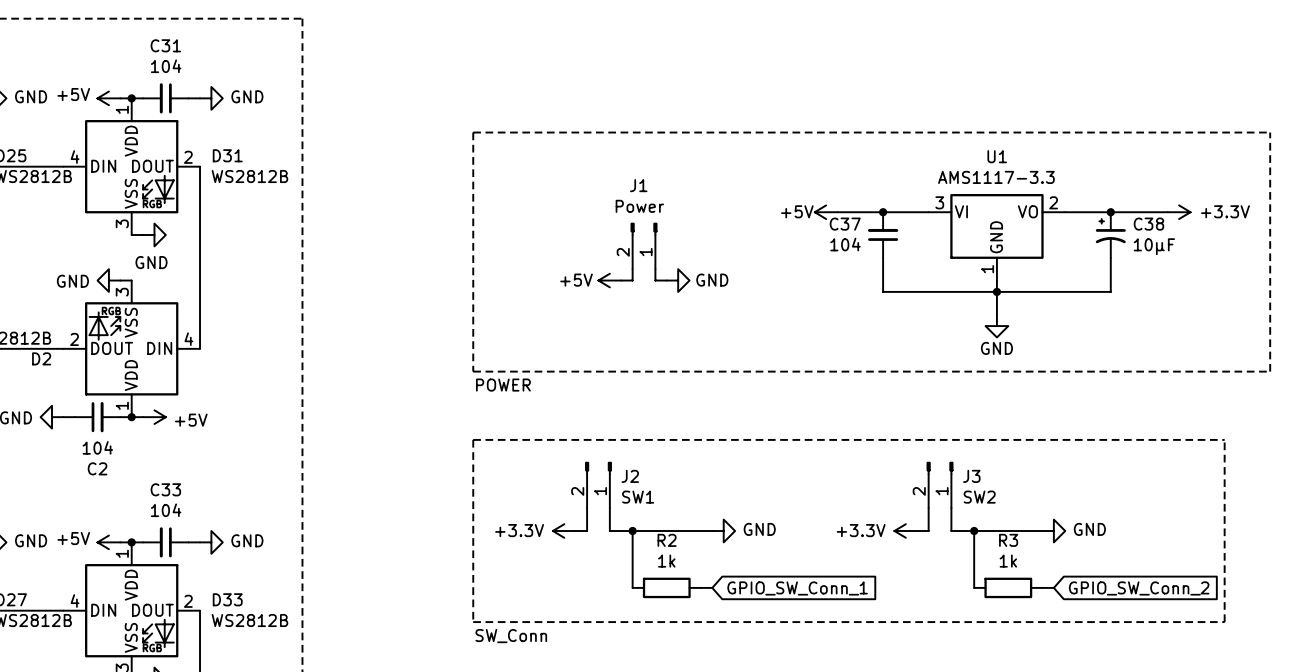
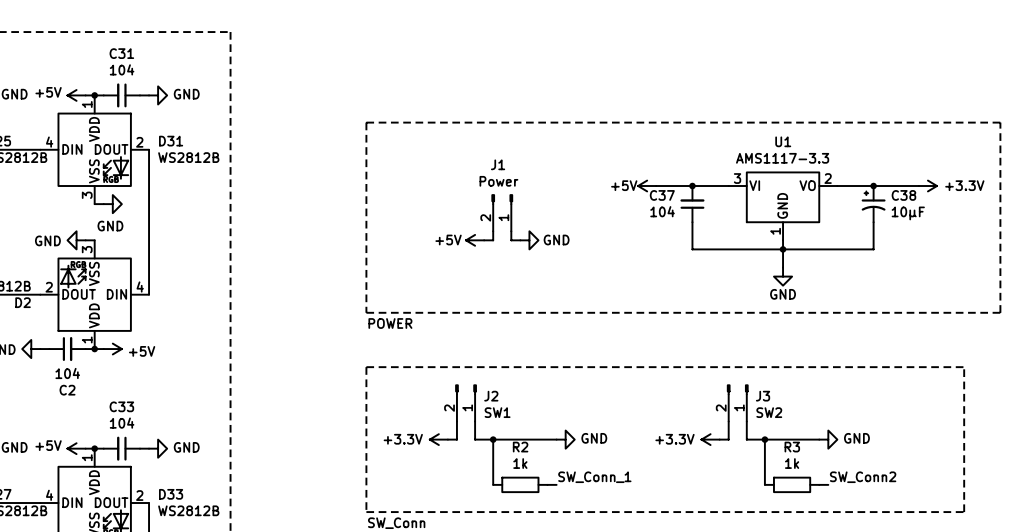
label: none -> SW_Conn_1 (594, 477)
label: none -> SW_Conn2 (863, 477)
global label: GPIO_SW_Conn_1 (797, 588) -> none
global label: GPIO_SW_Conn_2 (1139, 588) -> none

